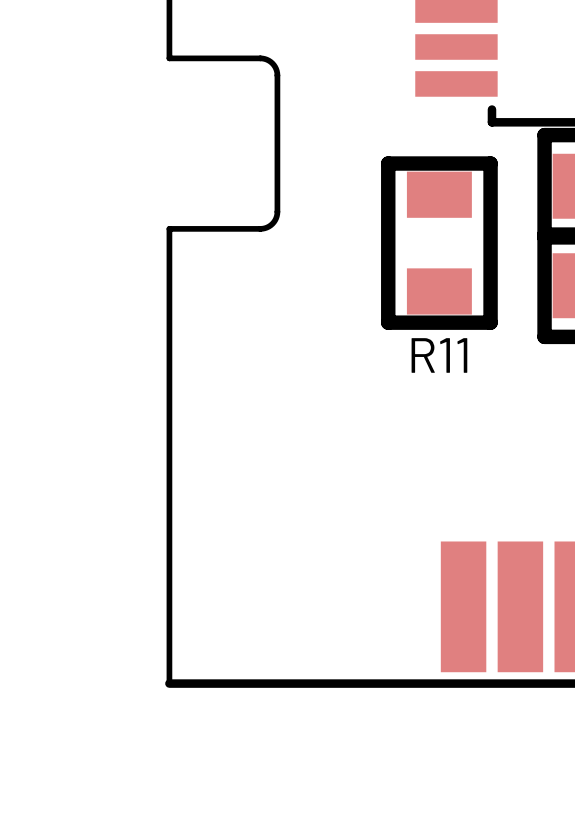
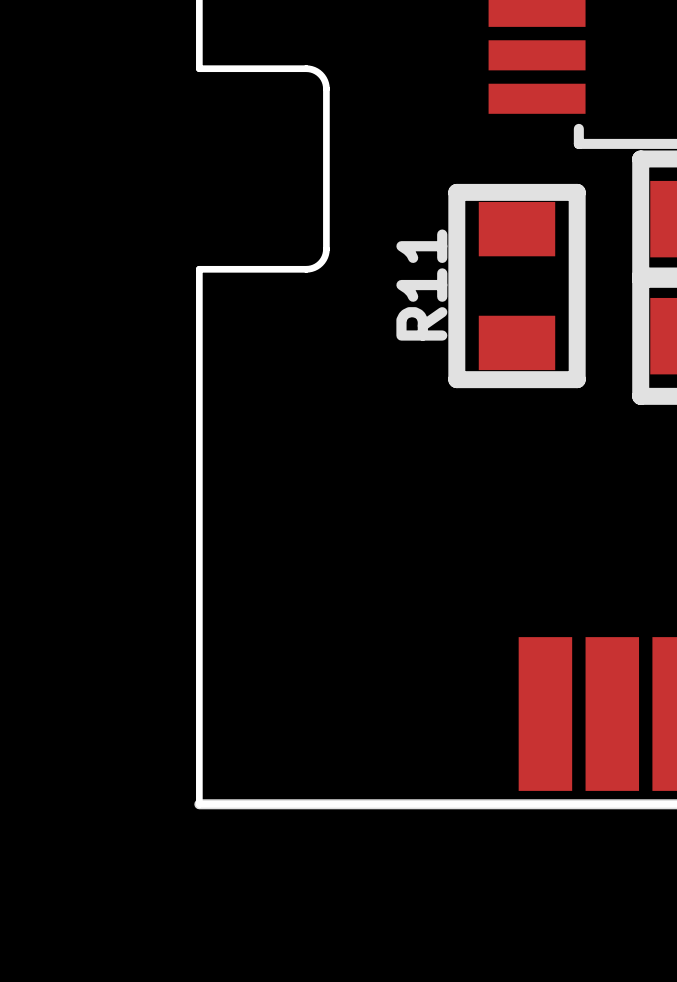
R11 name rotation: 0° (439, 355) -> 90° counterclockwise (421, 285)
R11 name position: R11 (439, 355) -> R11 (421, 285)

